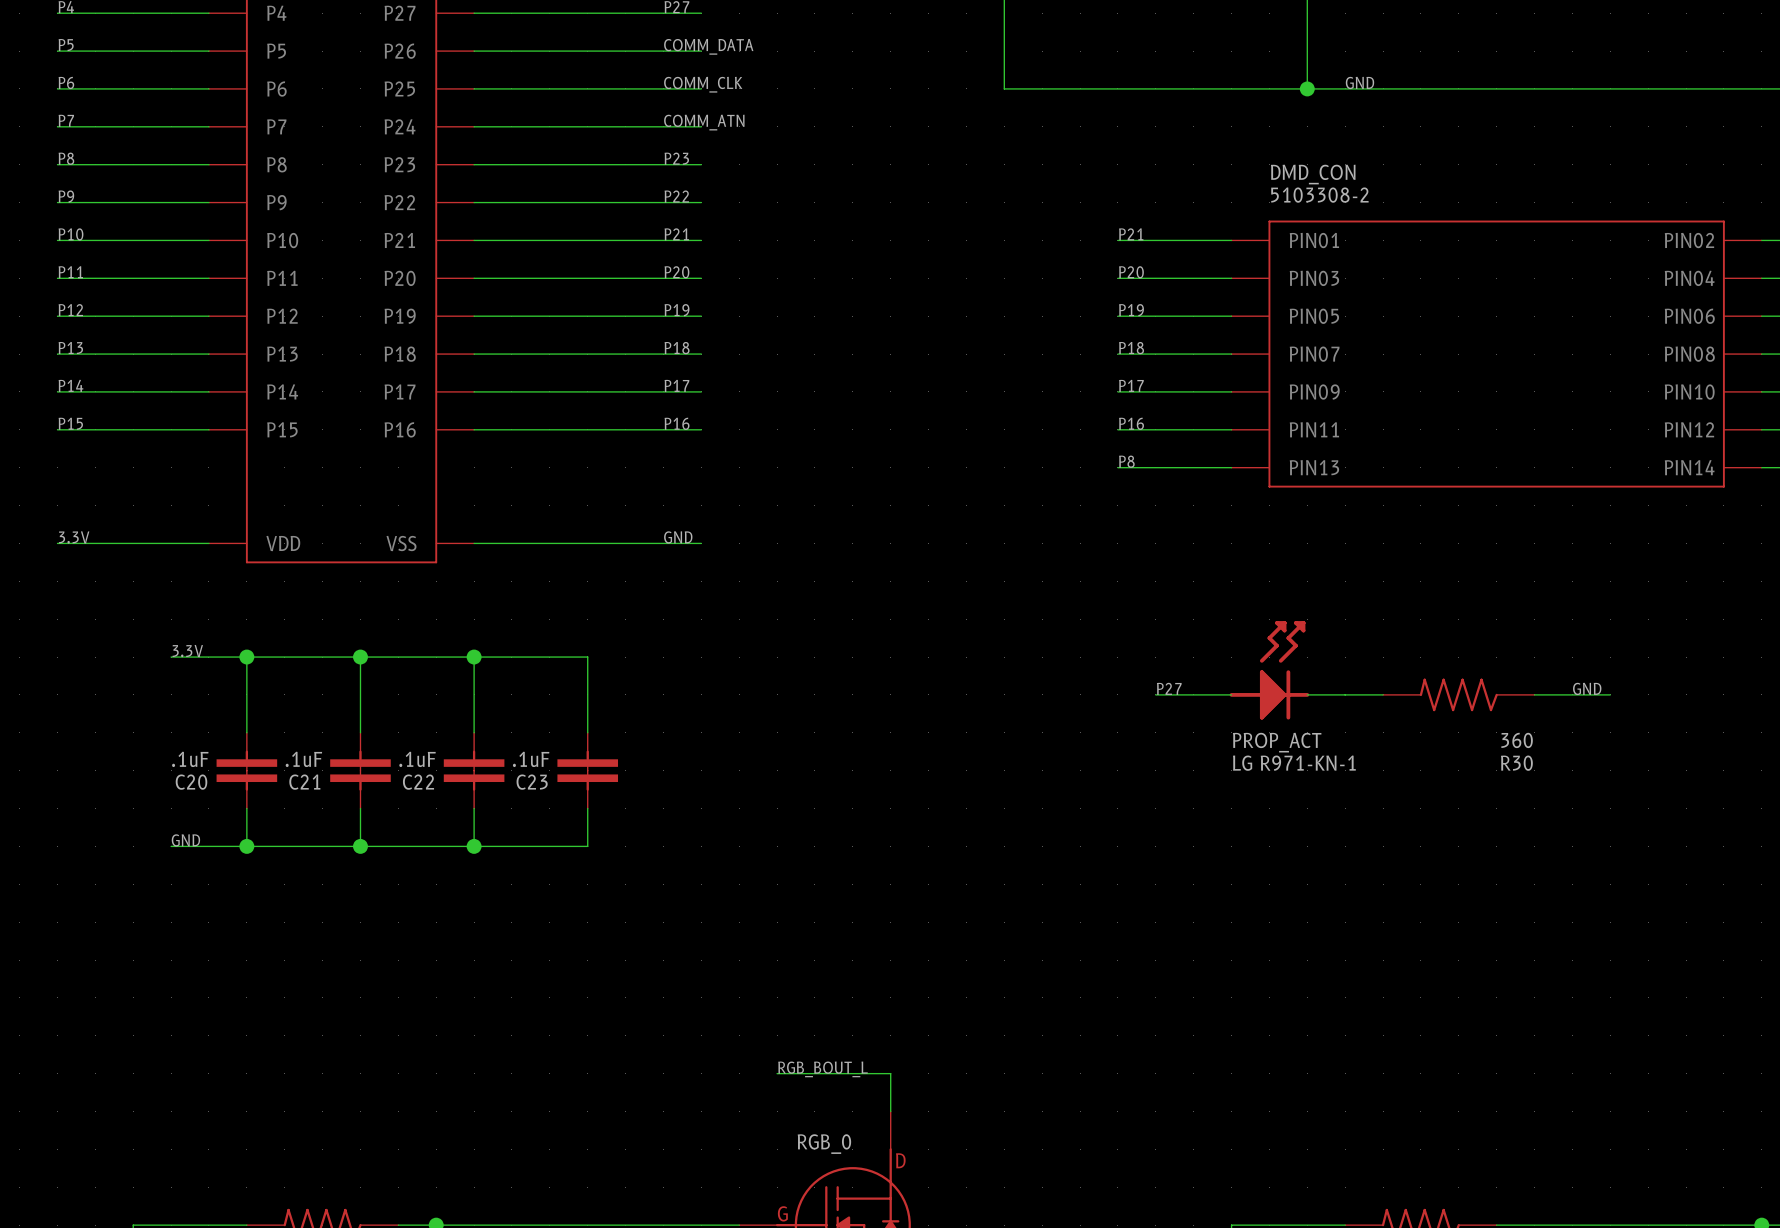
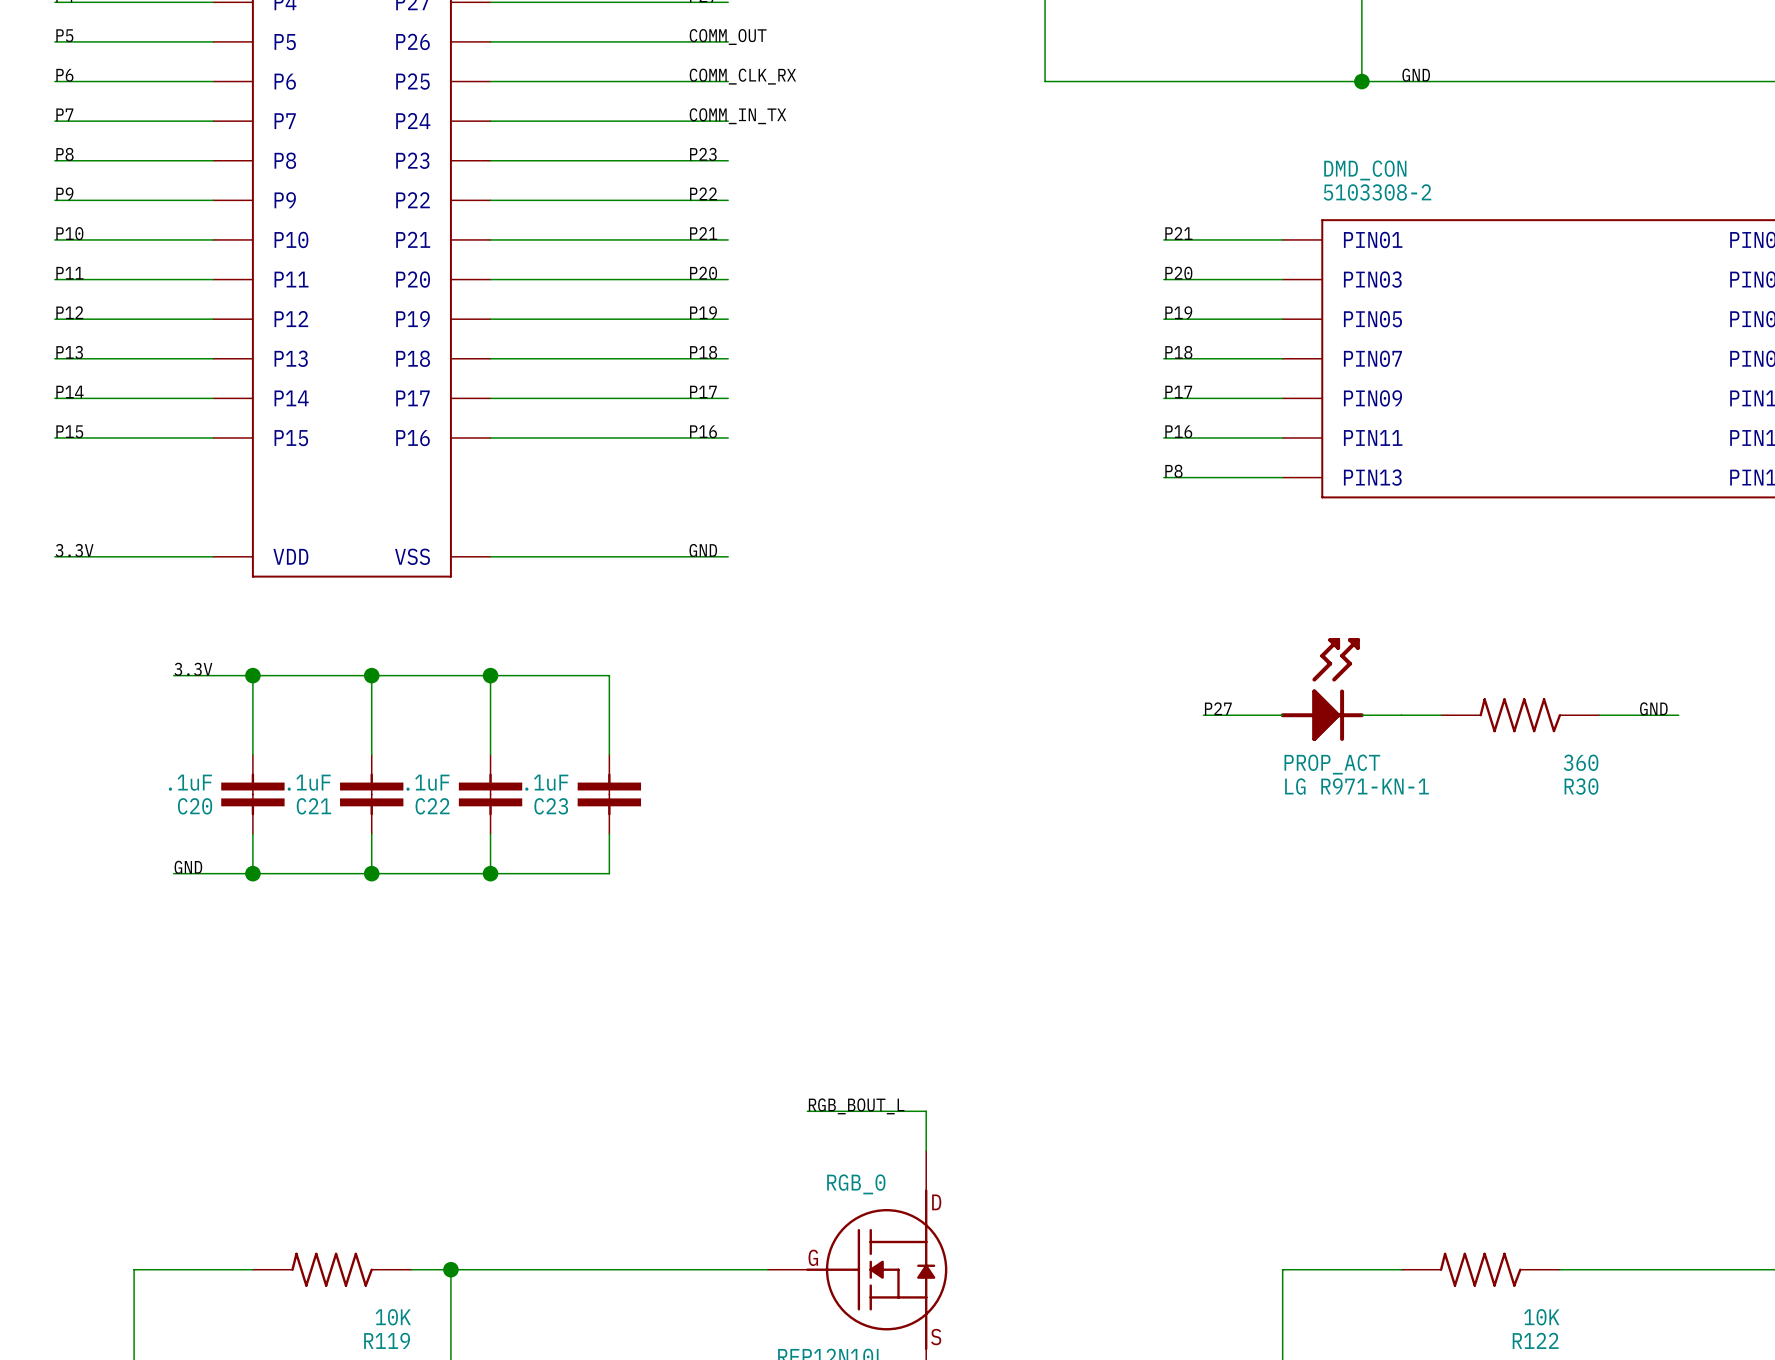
label: COMM_DATA (708, 46) -> COMM_OUT (728, 37)
label: COMM_CLK (703, 84) -> COMM_CLK_RX (742, 76)
label: COMM_ATN (704, 122) -> COMM_IN_TX (737, 116)

